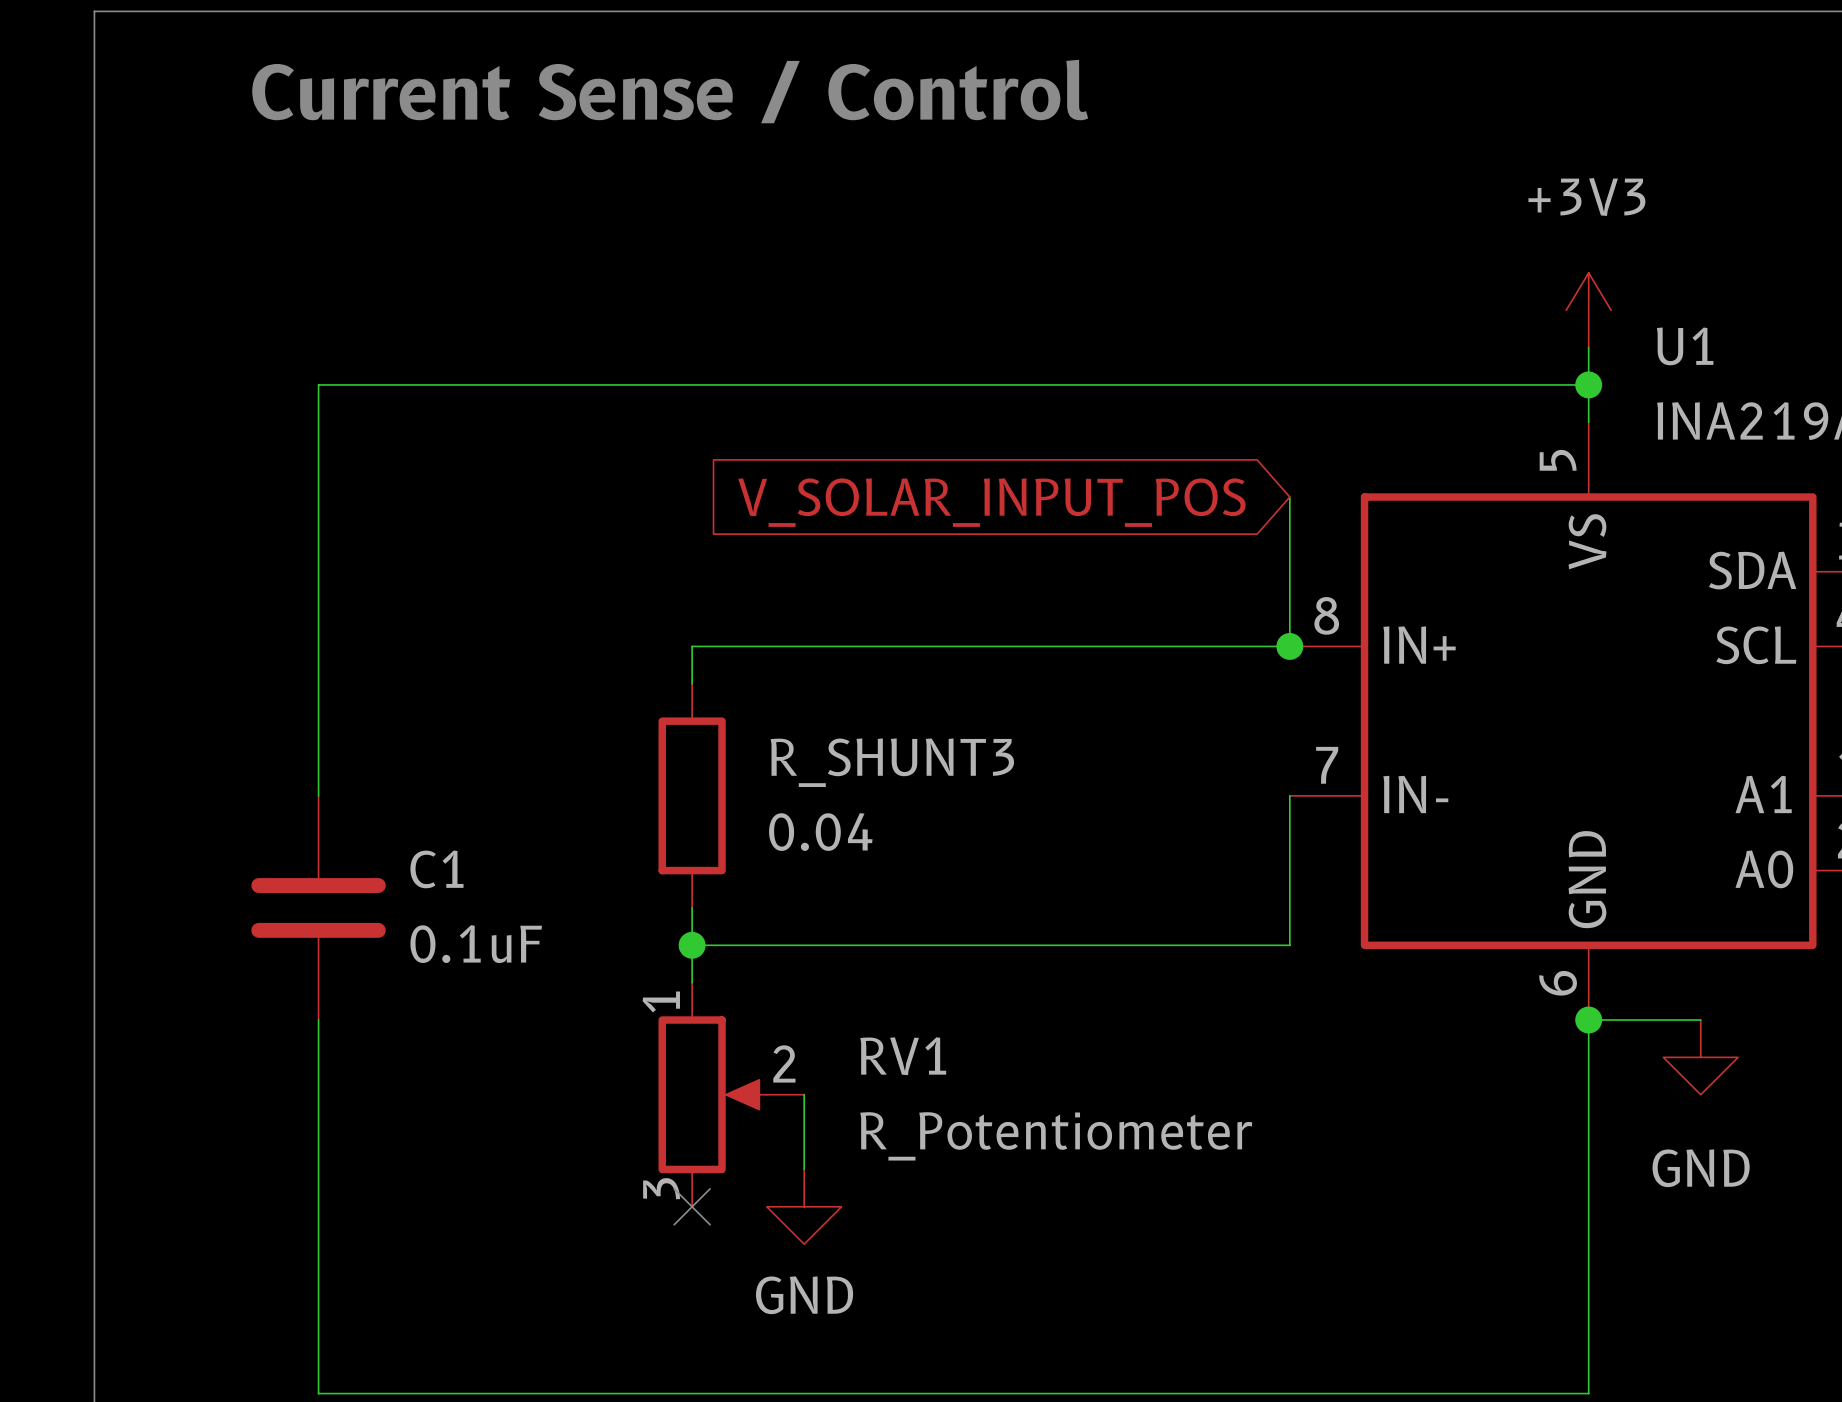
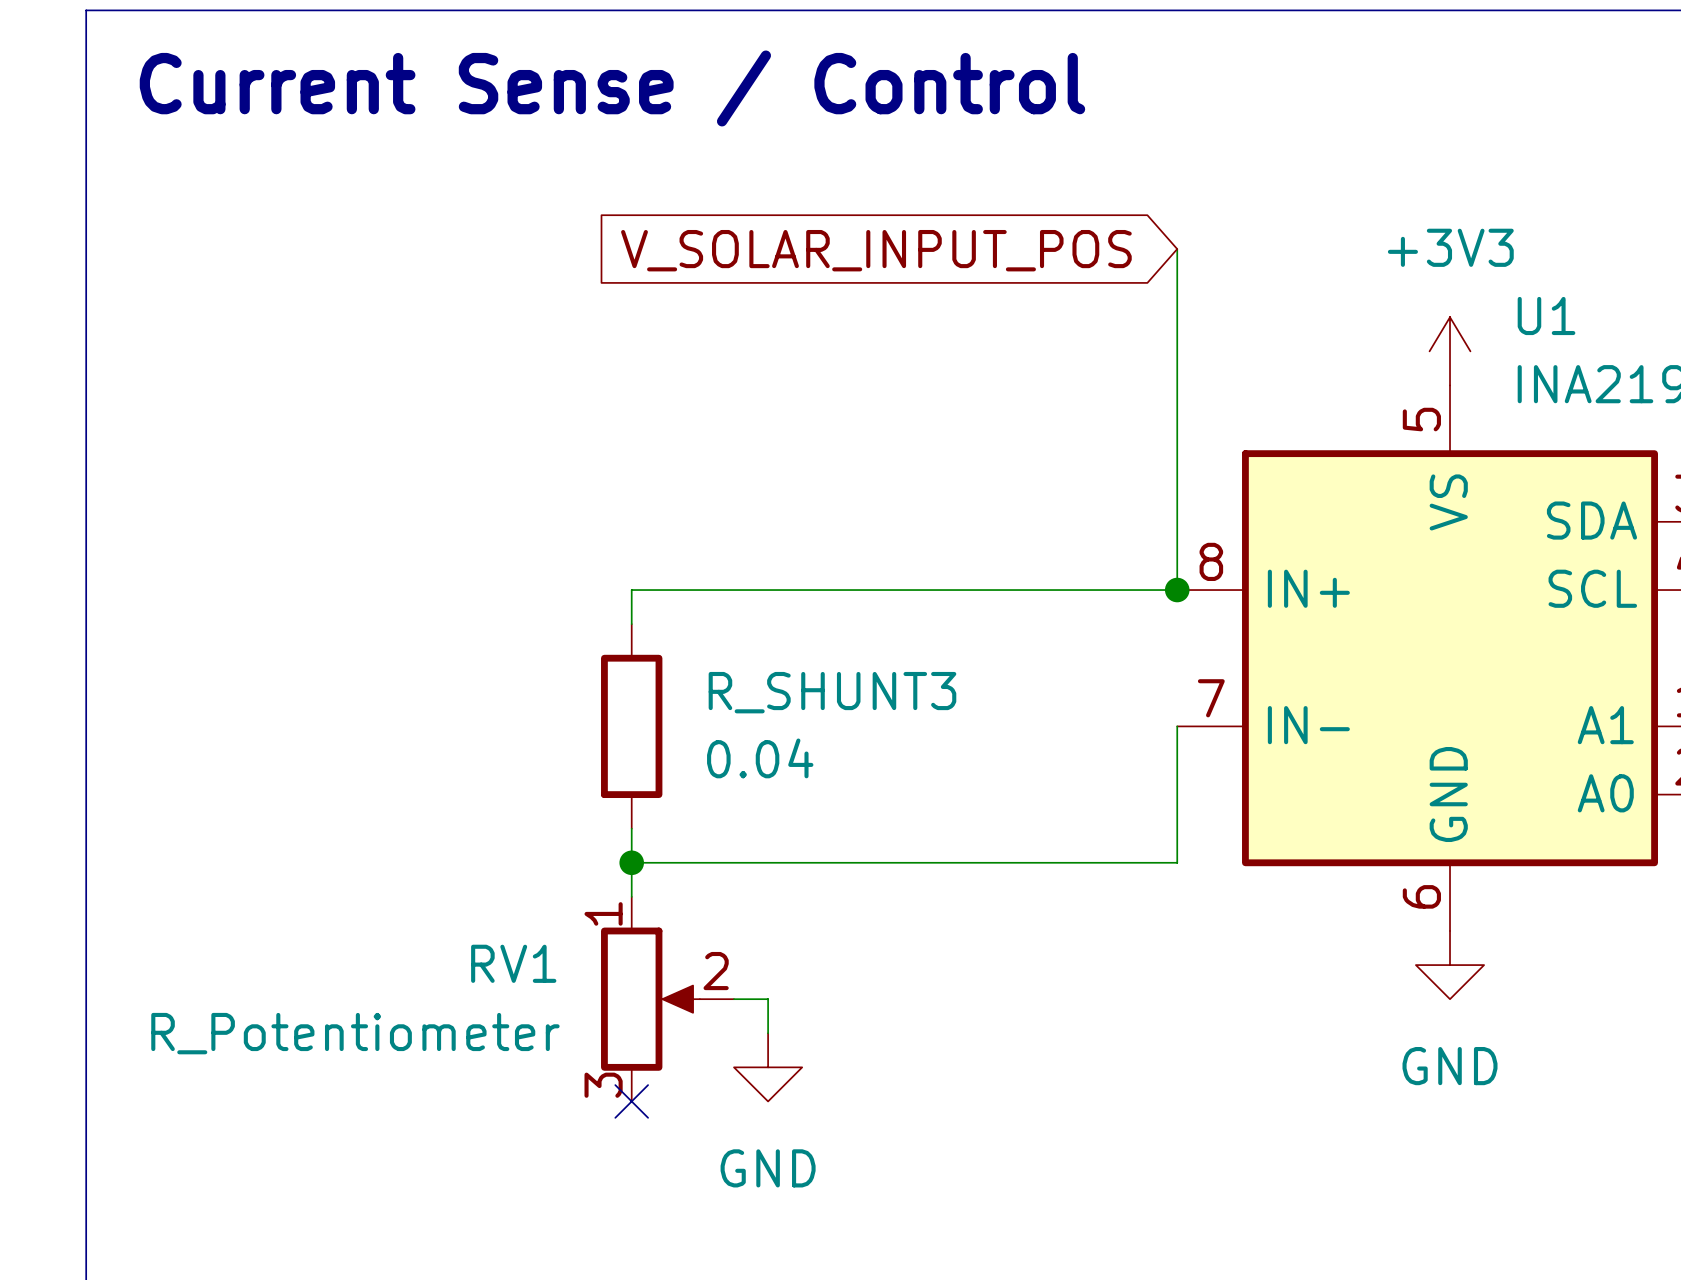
wire: none -> (1177, 249) (1177, 453)
power symbol position: +3V3 (1588, 310) -> +3V3 (1450, 351)
wire: (1588, 384) (318, 384) (318, 795) -> none
junction: (1588, 384) -> none
global label position: V_SOLAR_INPUT_POS (991, 502) -> V_SOLAR_INPUT_POS (876, 250)
C1: 0.1uF (318, 907) -> none
wire: (318, 1020) (318, 1393) (1588, 1393) (1588, 1020) (1700, 1020) -> none
junction: (1588, 1020) -> none
RV1 name position: RV1 (903, 1056) -> RV1 (513, 963)
power symbol position: GND (1700, 1057) -> GND (1450, 965)
wire: (804, 1094) (804, 1169) -> (733, 999) (768, 999) (768, 1033)
RV1 value position: R_Potentiometer (1056, 1136) -> R_Potentiometer (355, 1033)
power symbol position: GND (804, 1206) -> GND (768, 1067)
power symbol text position: GND (804, 1295) -> GND (768, 1168)

